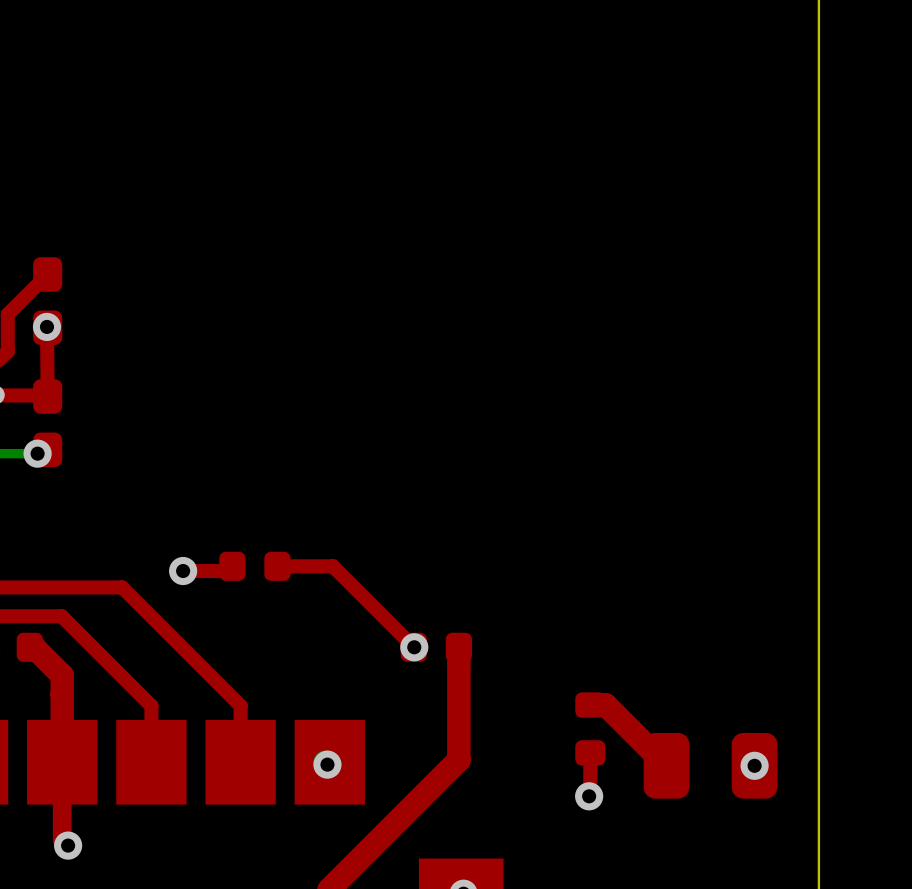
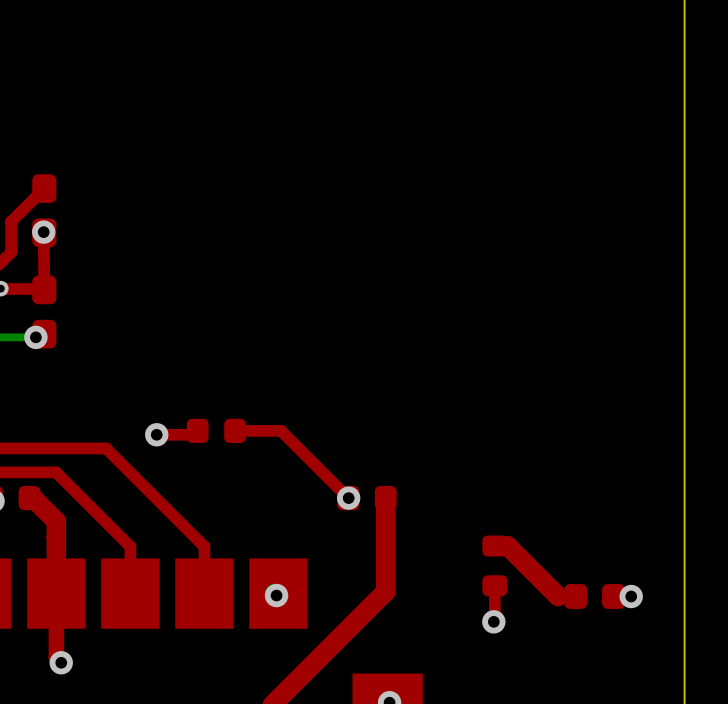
part footprint: [643, 732, 778, 799] -> [564, 584, 626, 609]

